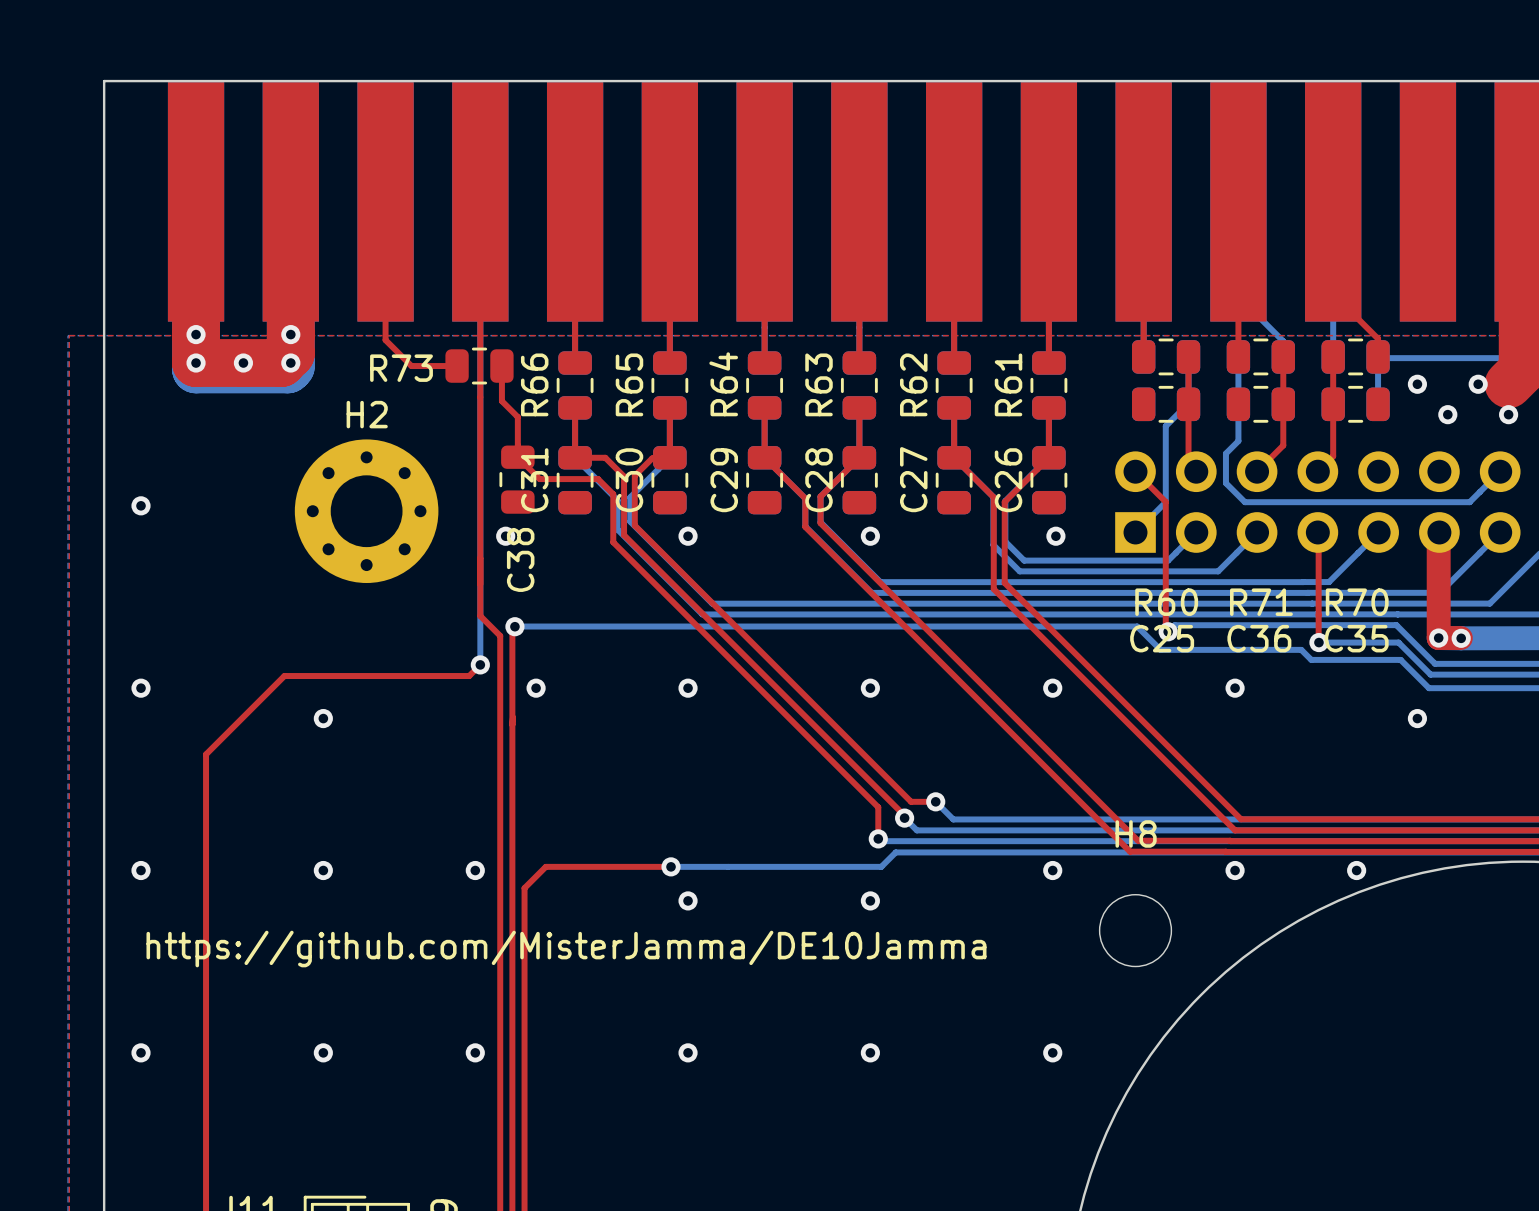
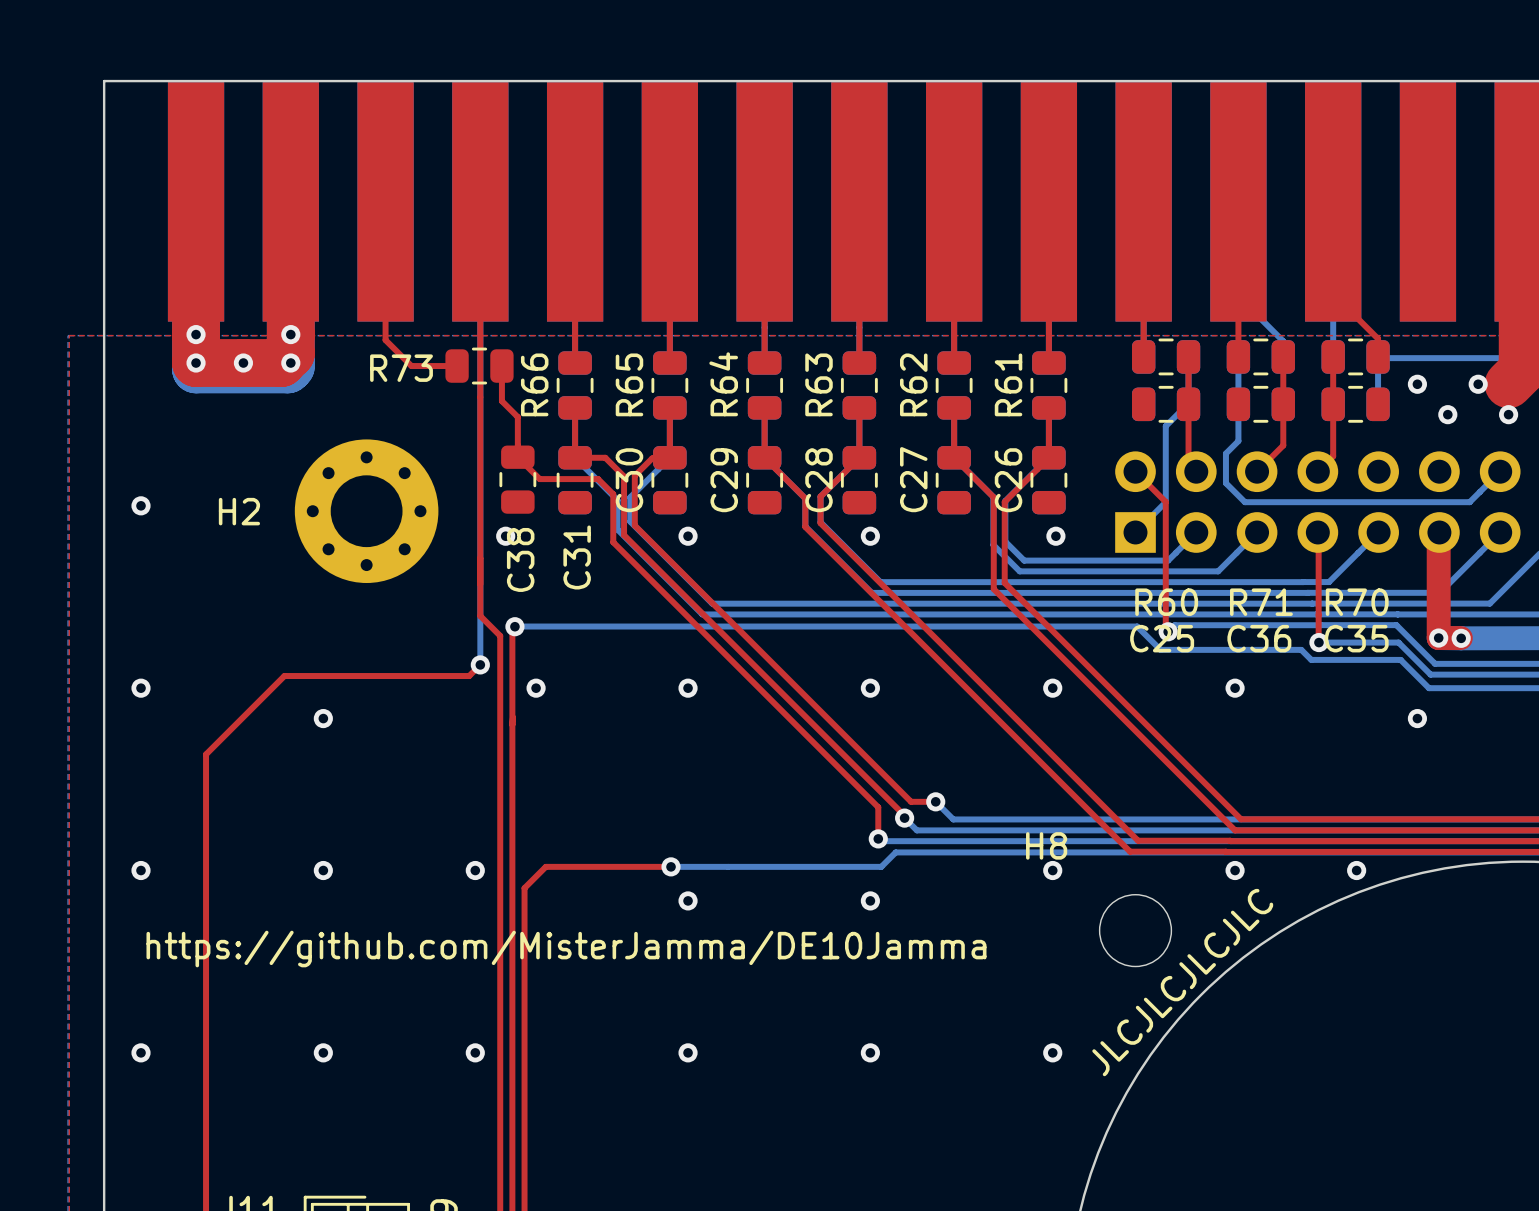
H2 name position: H2 (367, 414) -> H2 (239, 511)
C31 name position: C31 (534, 480) -> C31 (577, 557)
H8 name position: H8 (1136, 833) -> H8 (1046, 845)
text: none -> JLCJLCJLCJLC (1182, 982)

